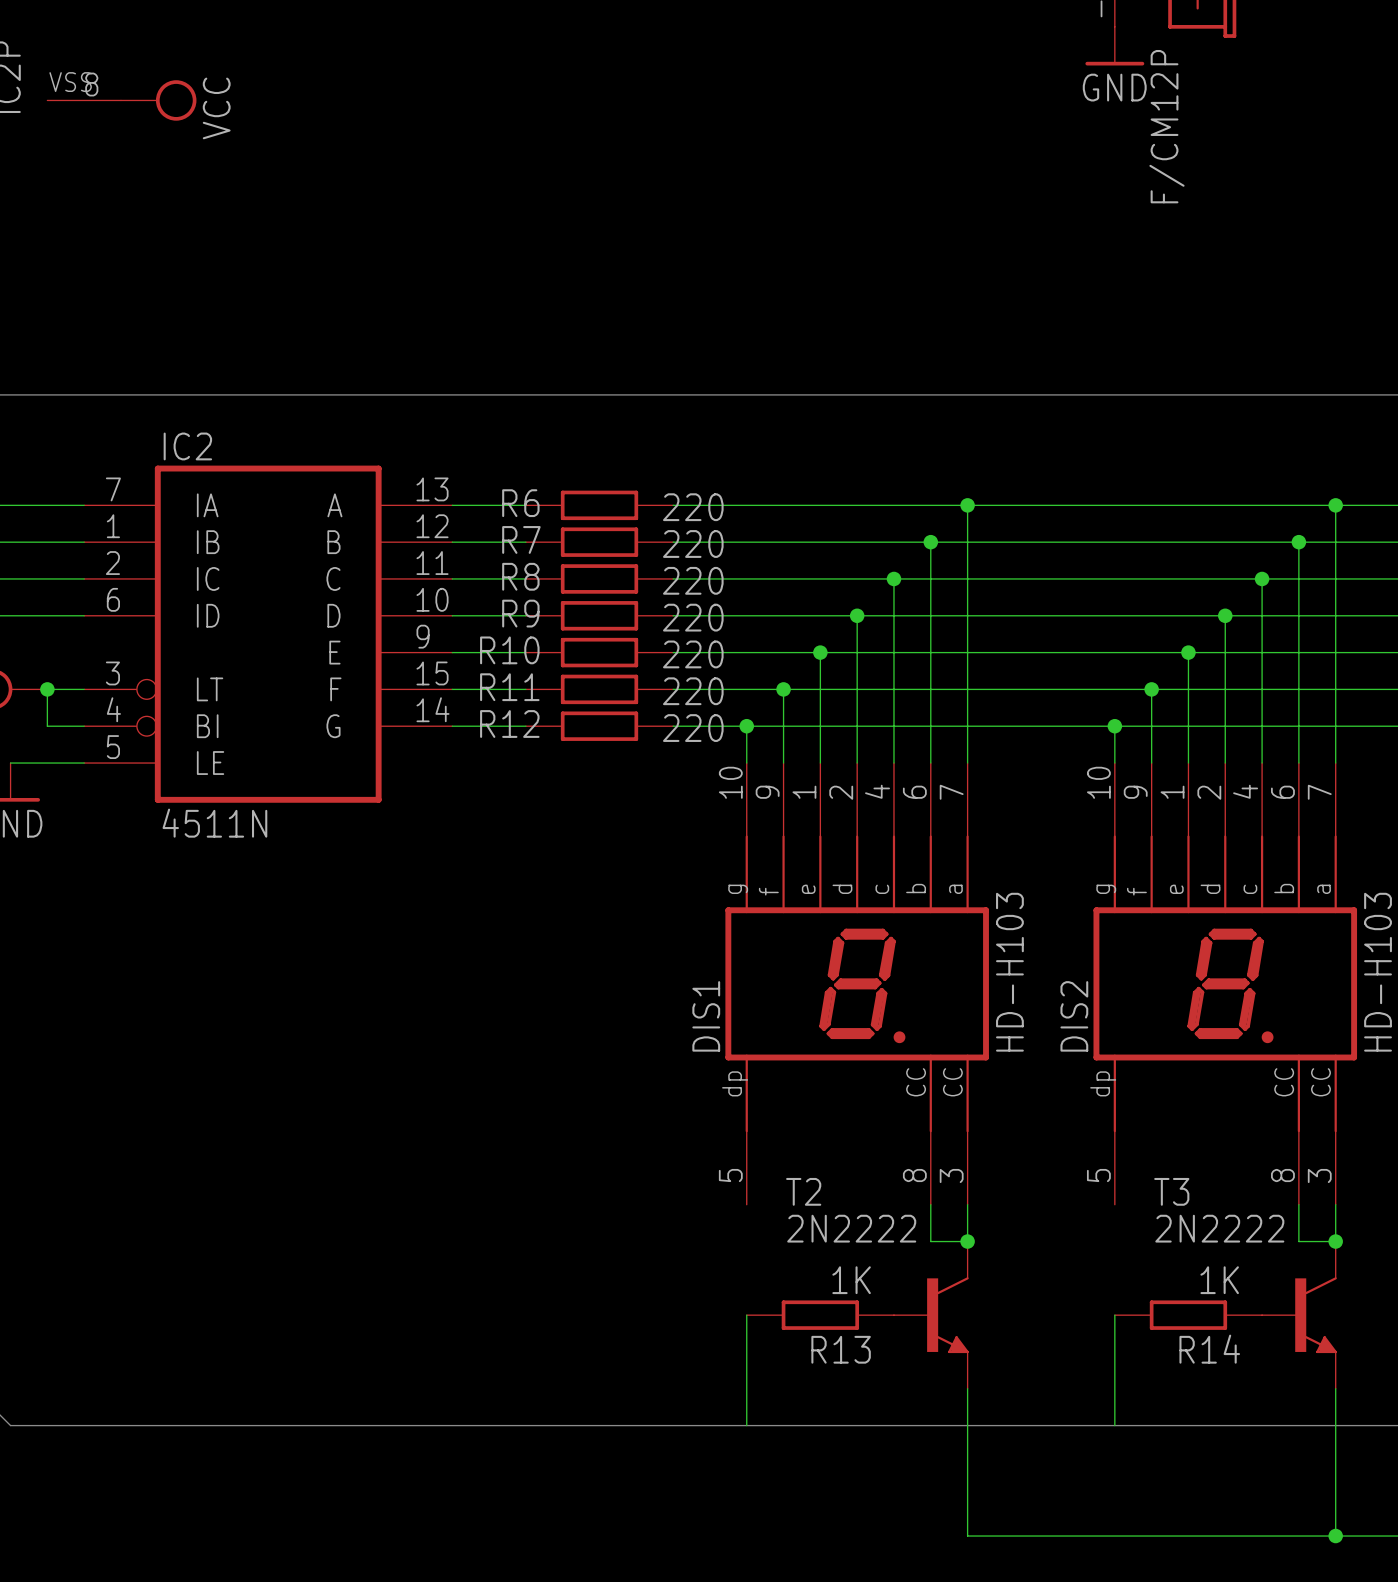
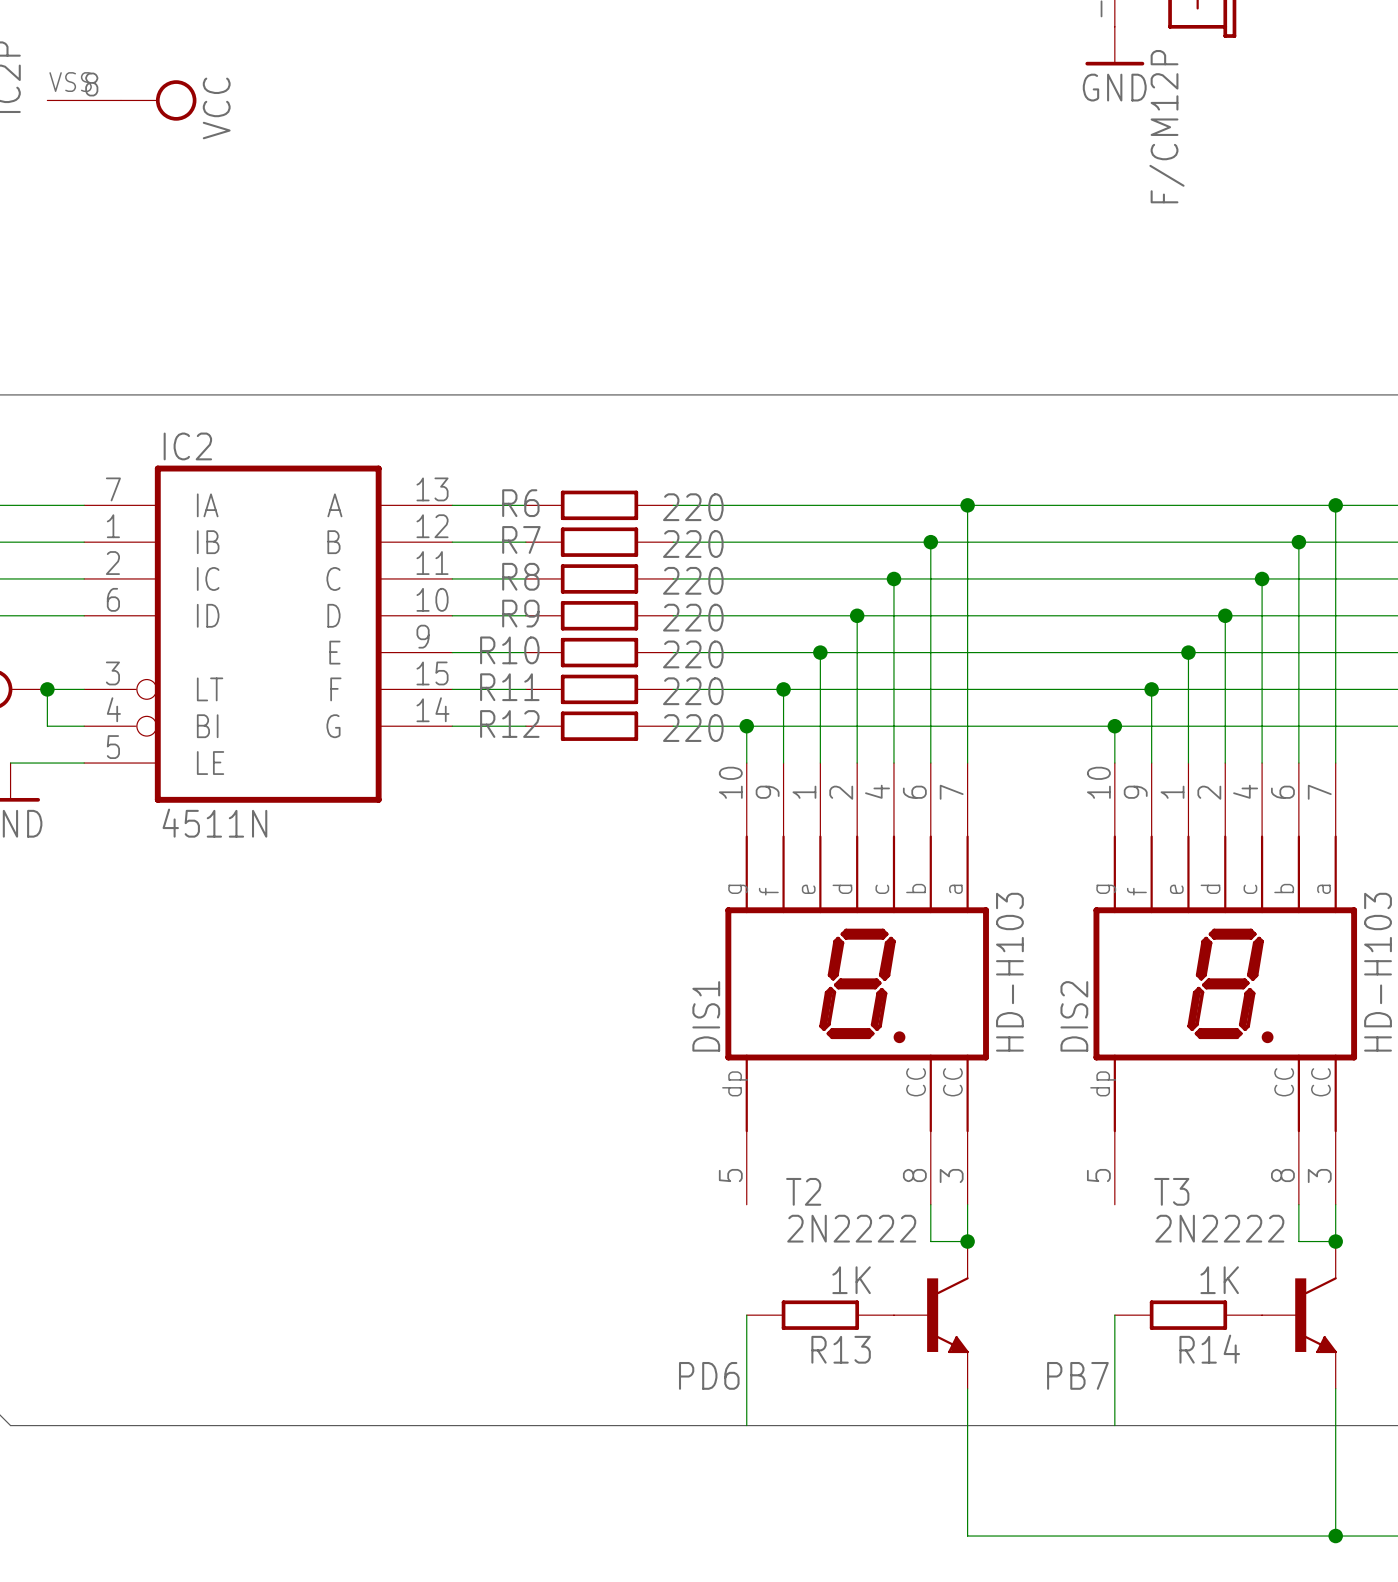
label: none -> PD6 (709, 1375)
label: none -> PB7 (1077, 1375)

